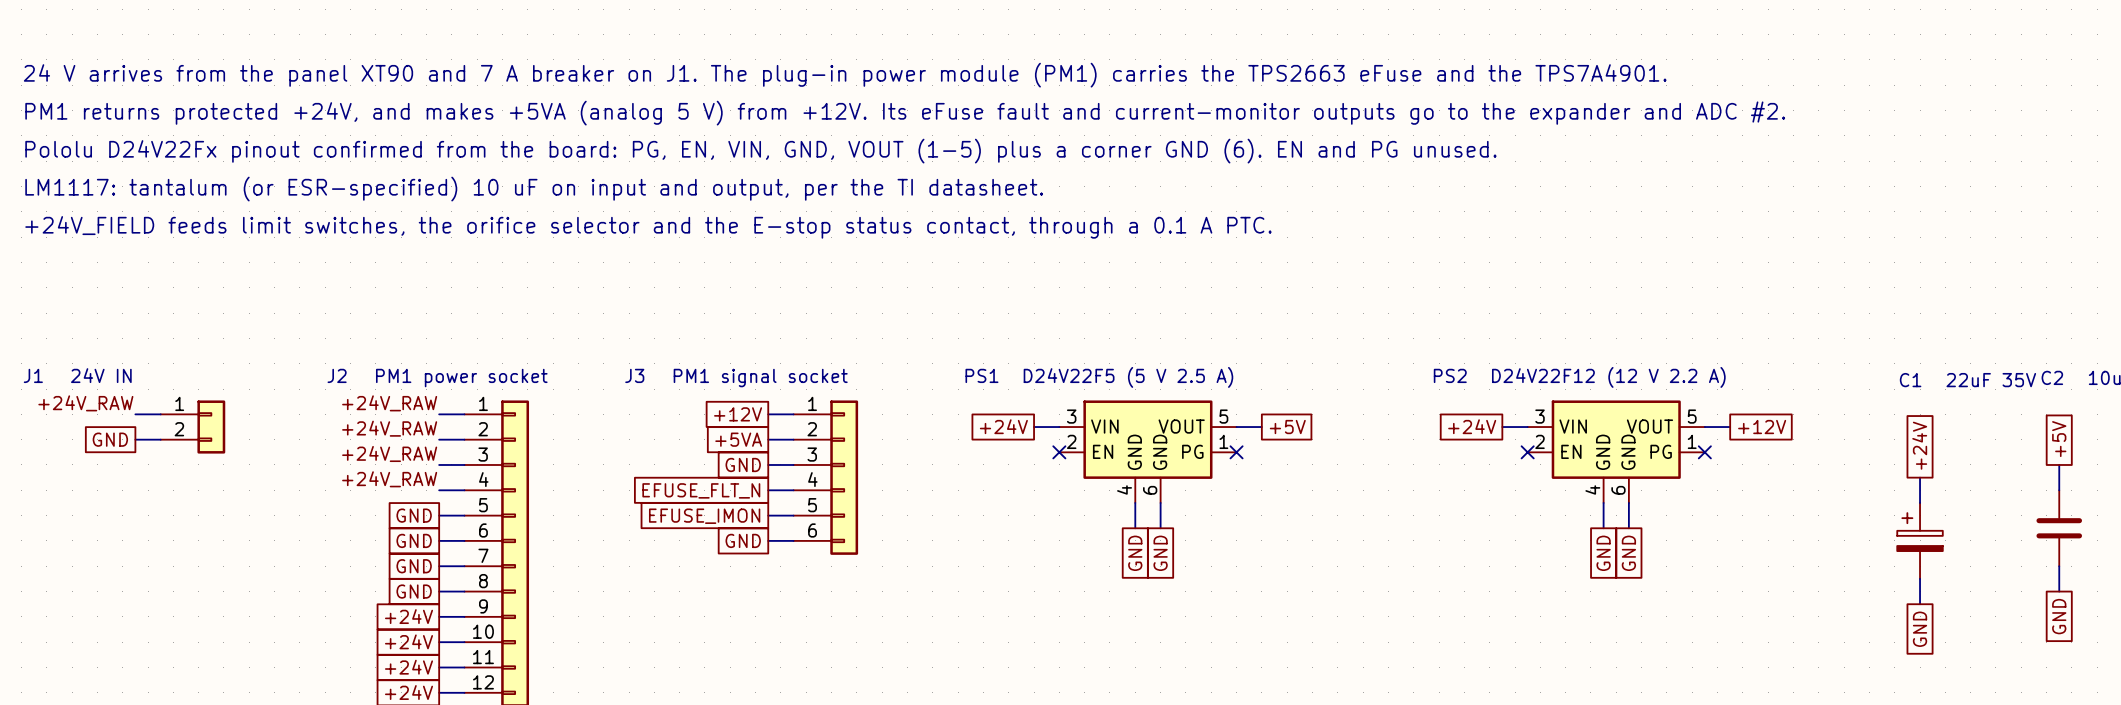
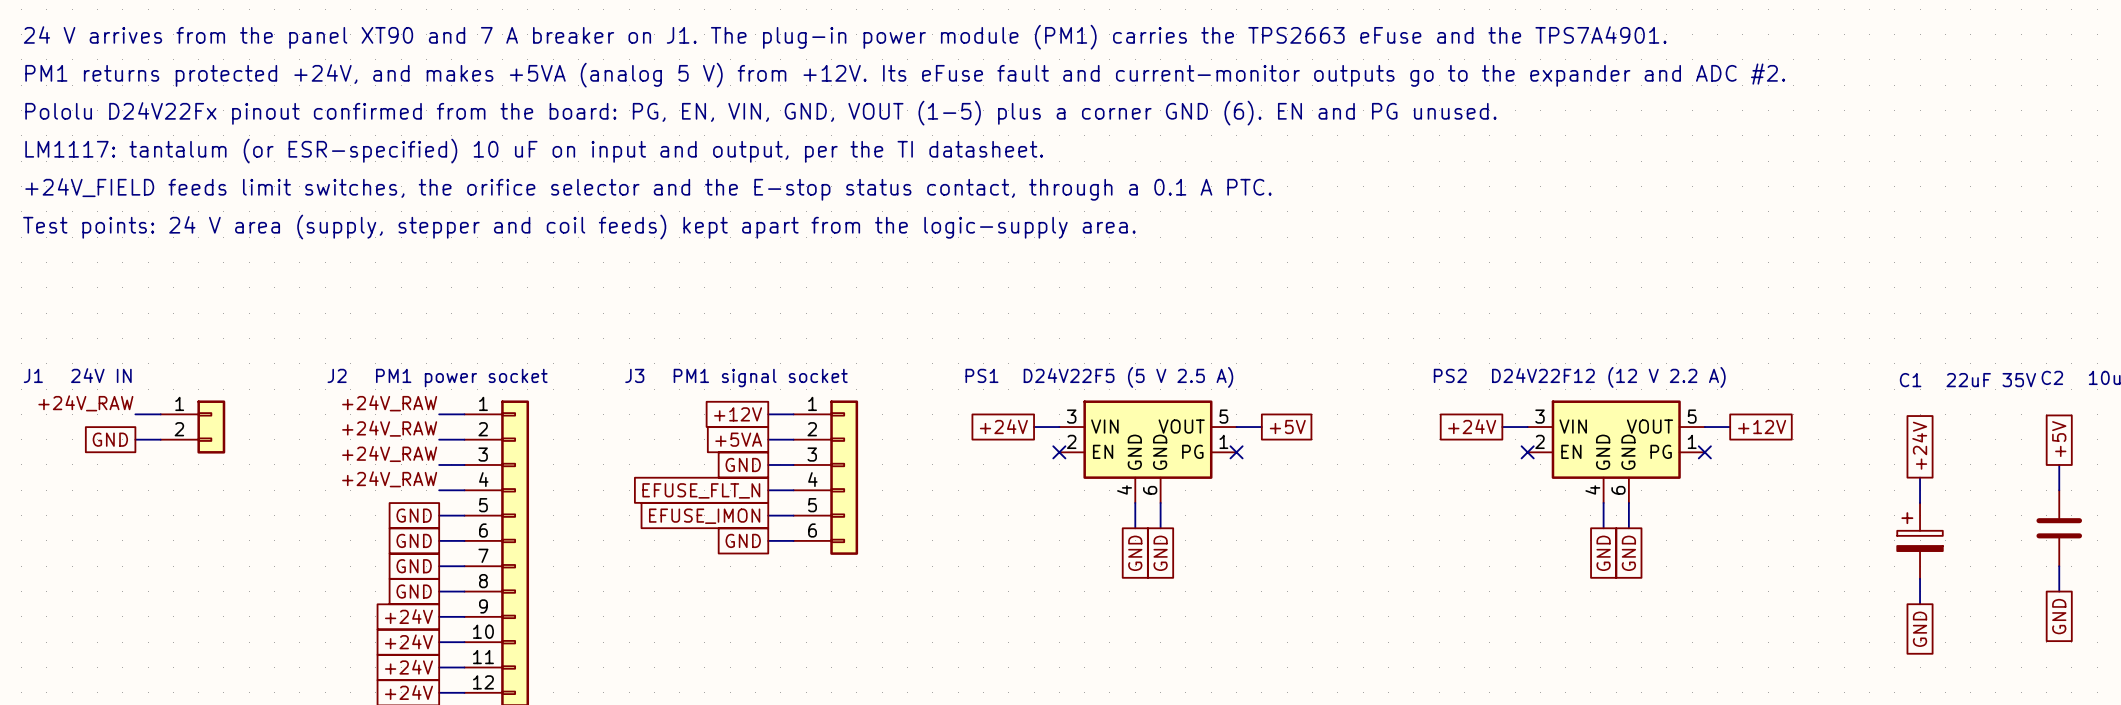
text: none -> 24 V arrives from the panel XT90 and 7 A breaker on J1. The plug-in power module (PM1) carries the TPS2663 eFuse and the TPS7A4901. (845, 37)
text: 24 V arrives from the panel XT90 and 7 A breaker on J1. The plug-in power module (PM1) carries the TPS2663 eFuse and the TPS7A4901. (845, 75) -> PM1 returns protected +24V, and makes +5VA (analog 5 V) from +12V. Its eFuse fault and current-monitor outputs go to the expander and ADC #2. (905, 75)
text: PM1 returns protected +24V, and makes +5VA (analog 5 V) from +12V. Its eFuse fault and current-monitor outputs go to the expander and ADC #2. (905, 113) -> Pololu D24V22Fx pinout confirmed from the board: PG, EN, VIN, GND, VOUT (1-5) plus a corner GND (6). EN and PG unused. (760, 113)
text: Pololu D24V22Fx pinout confirmed from the board: PG, EN, VIN, GND, VOUT (1-5) plus a corner GND (6). EN and PG unused. (760, 151) -> LM1117: tantalum (or ESR-specified) 10 uF on input and output, per the TI datasheet. (534, 151)
text: LM1117: tantalum (or ESR-specified) 10 uF on input and output, per the TI datasheet. (534, 189) -> +24V_FIELD feeds limit switches, the orifice selector and the E-stop status contact, through a 0.1 A PTC. (648, 189)
text: +24V_FIELD feeds limit switches, the orifice selector and the E-stop status contact, through a 0.1 A PTC. (648, 227) -> Test points: 24 V area (supply, stepper and coil feeds) kept apart from the logic-supply area. (579, 227)

